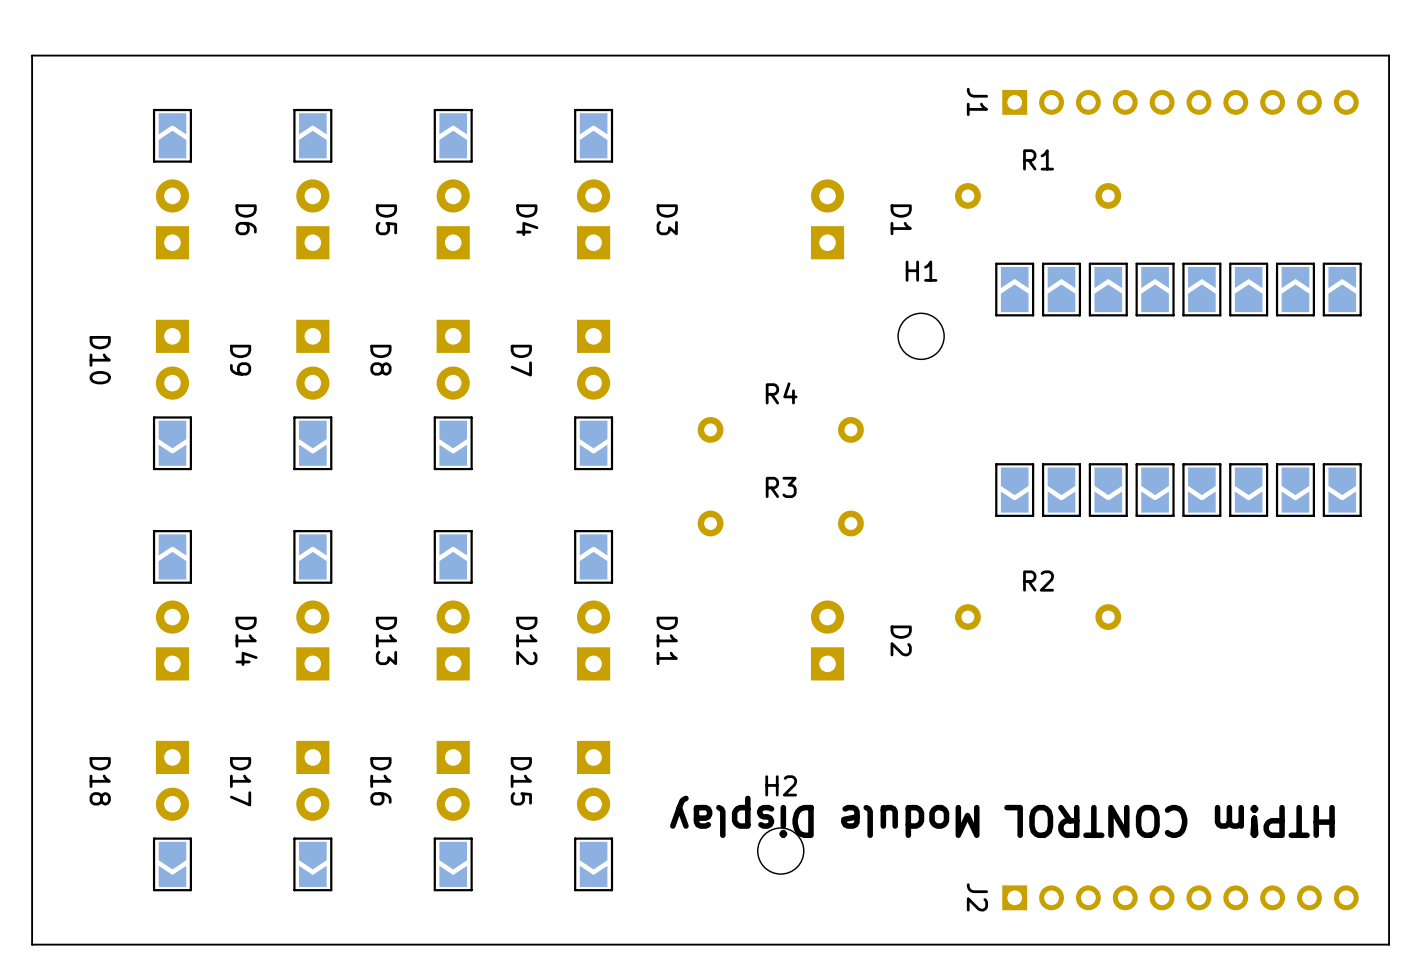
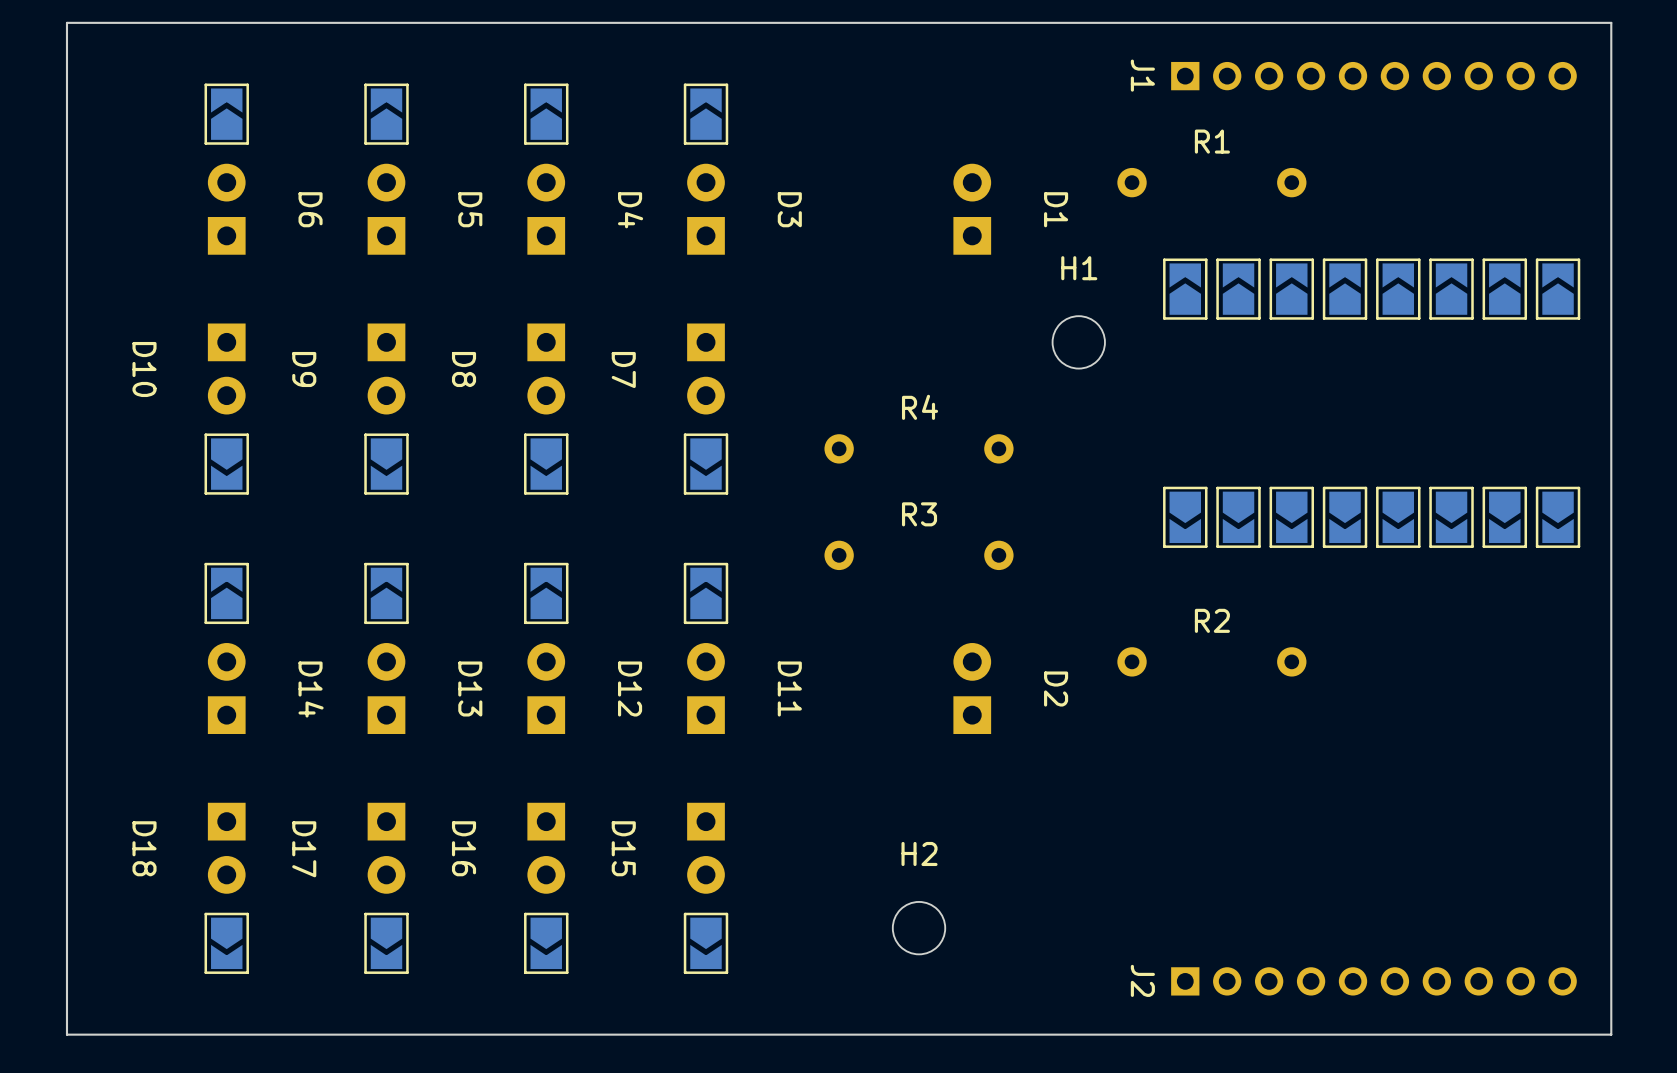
text: HTP!m CONTROL Module Display (1002, 816) -> none

